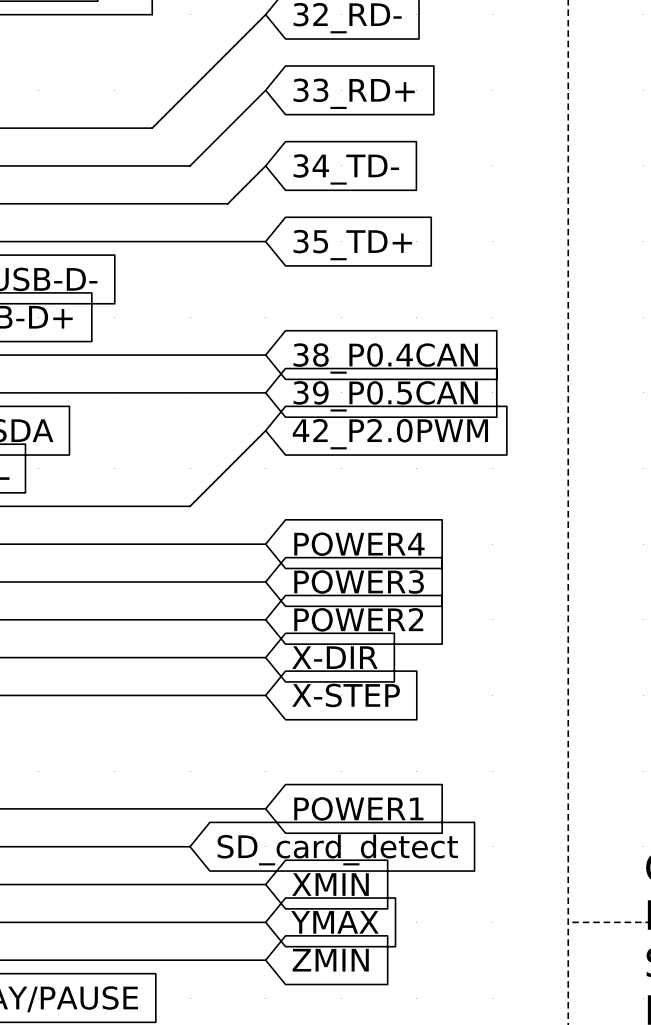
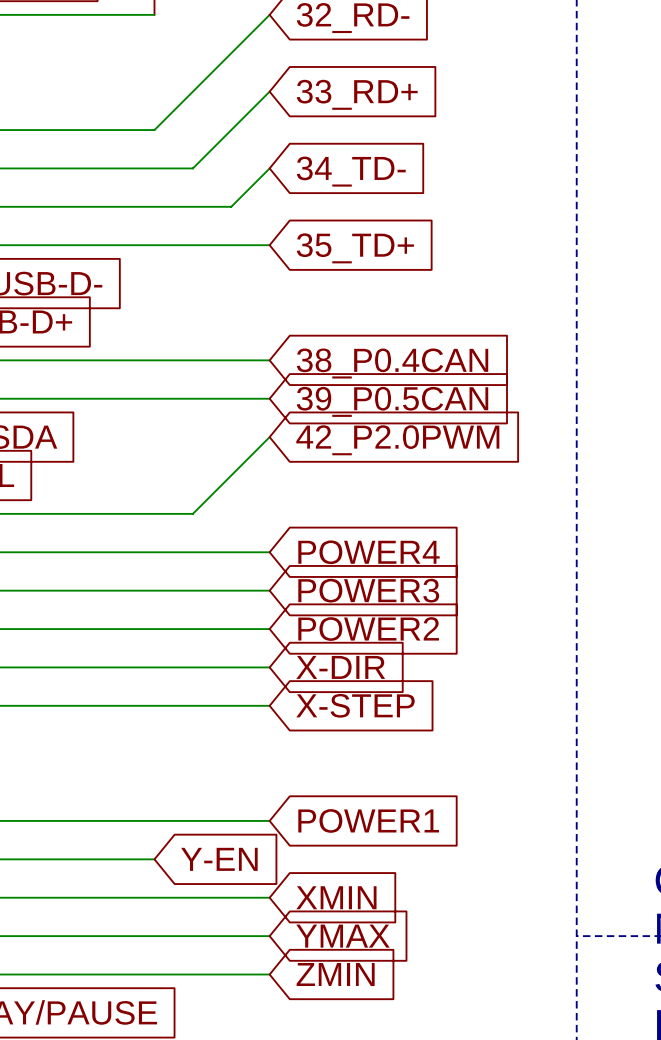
wire: (152, 846) (190, 846) -> none
global label: none -> Y-EN (219, 859)
global label: SD_card_detect (337, 849) -> none

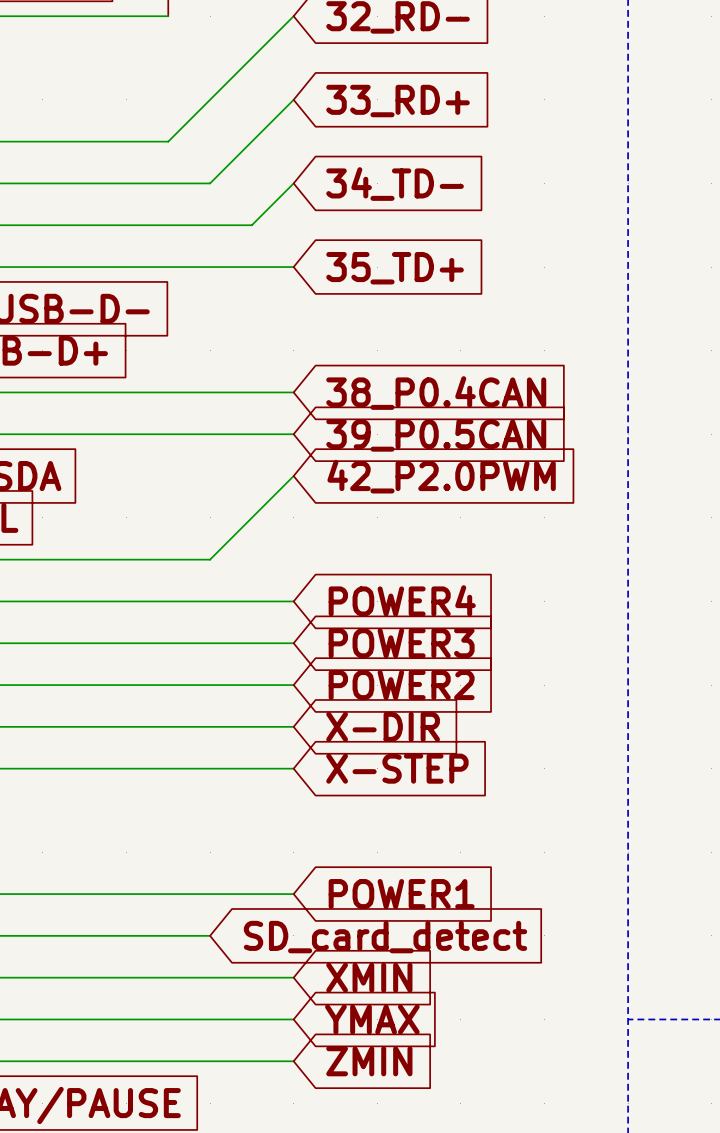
wire: none -> (168, 935) (210, 935)
global label: Y-EN (219, 859) -> none
global label: none -> SD_card_detect (385, 937)

